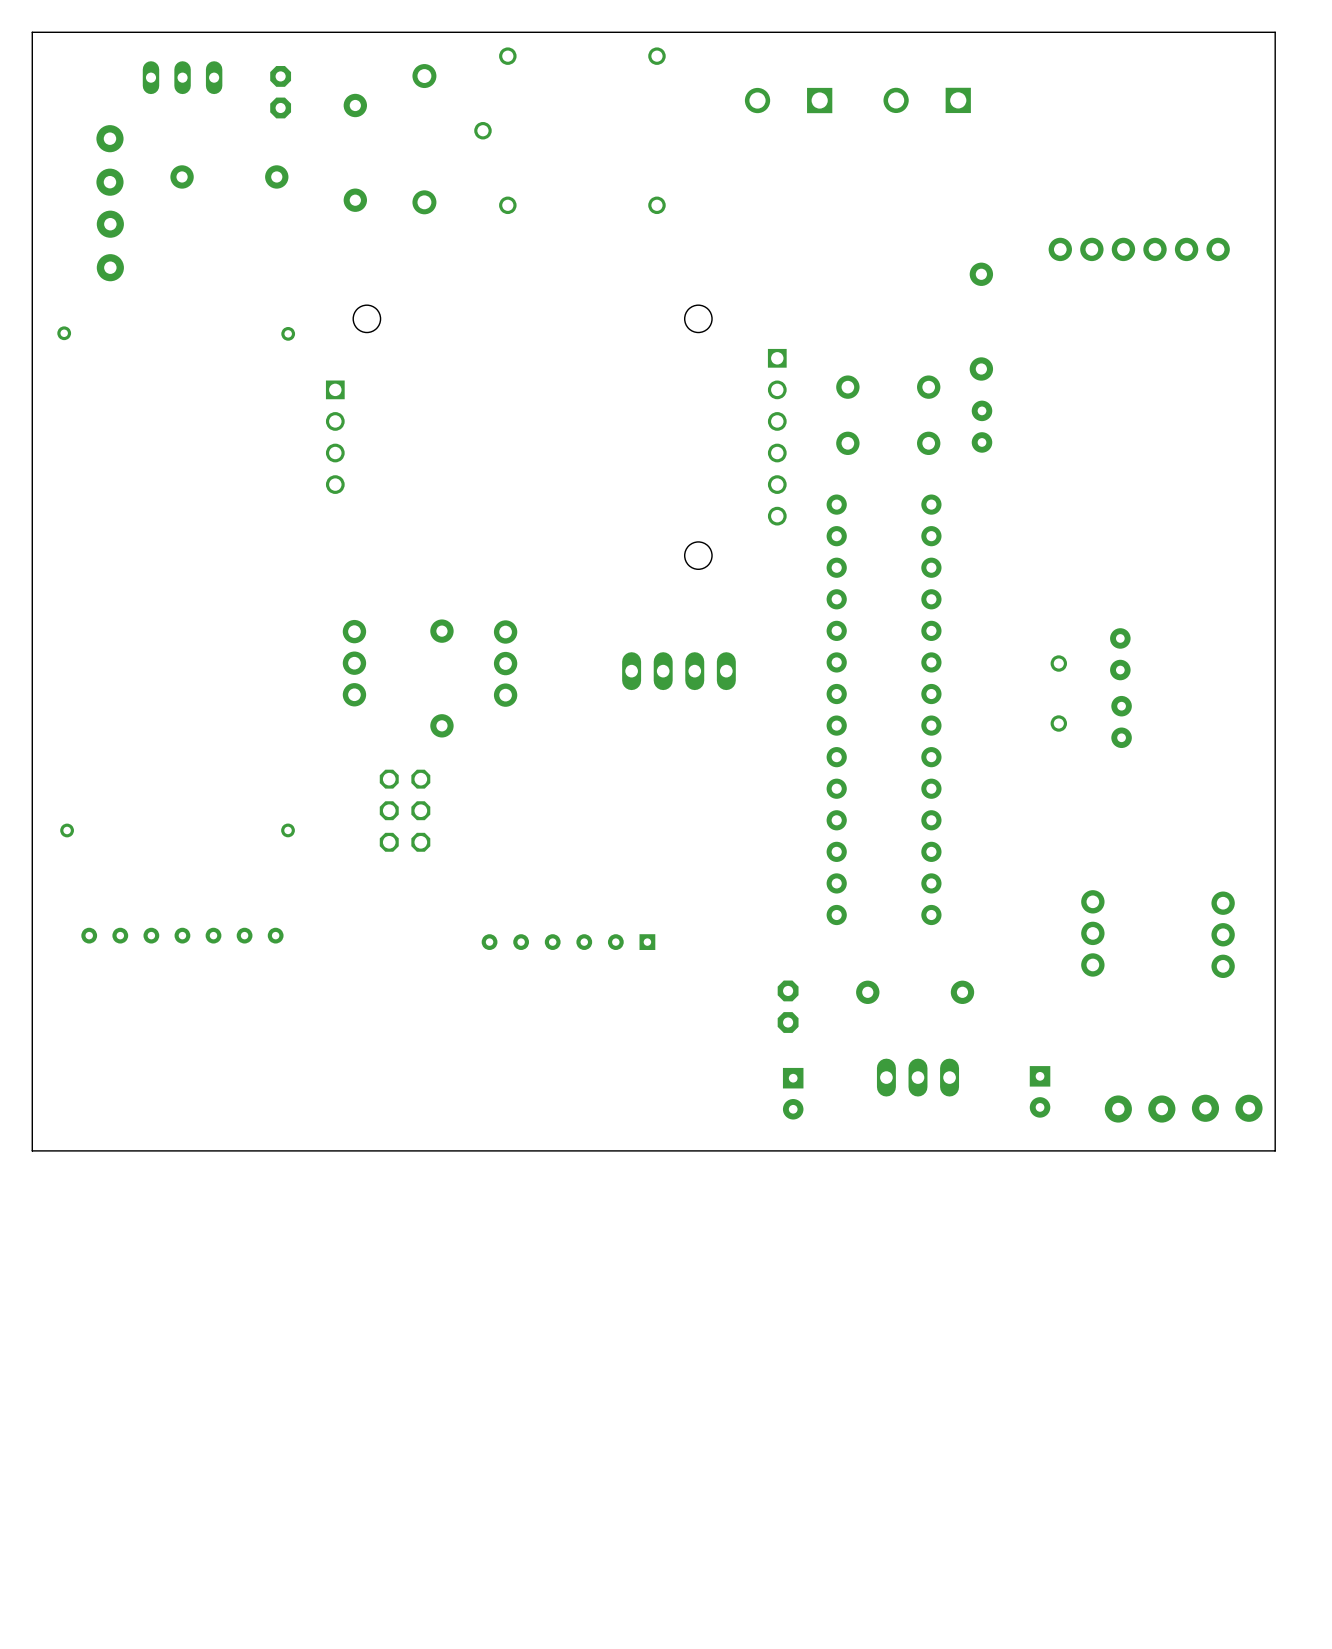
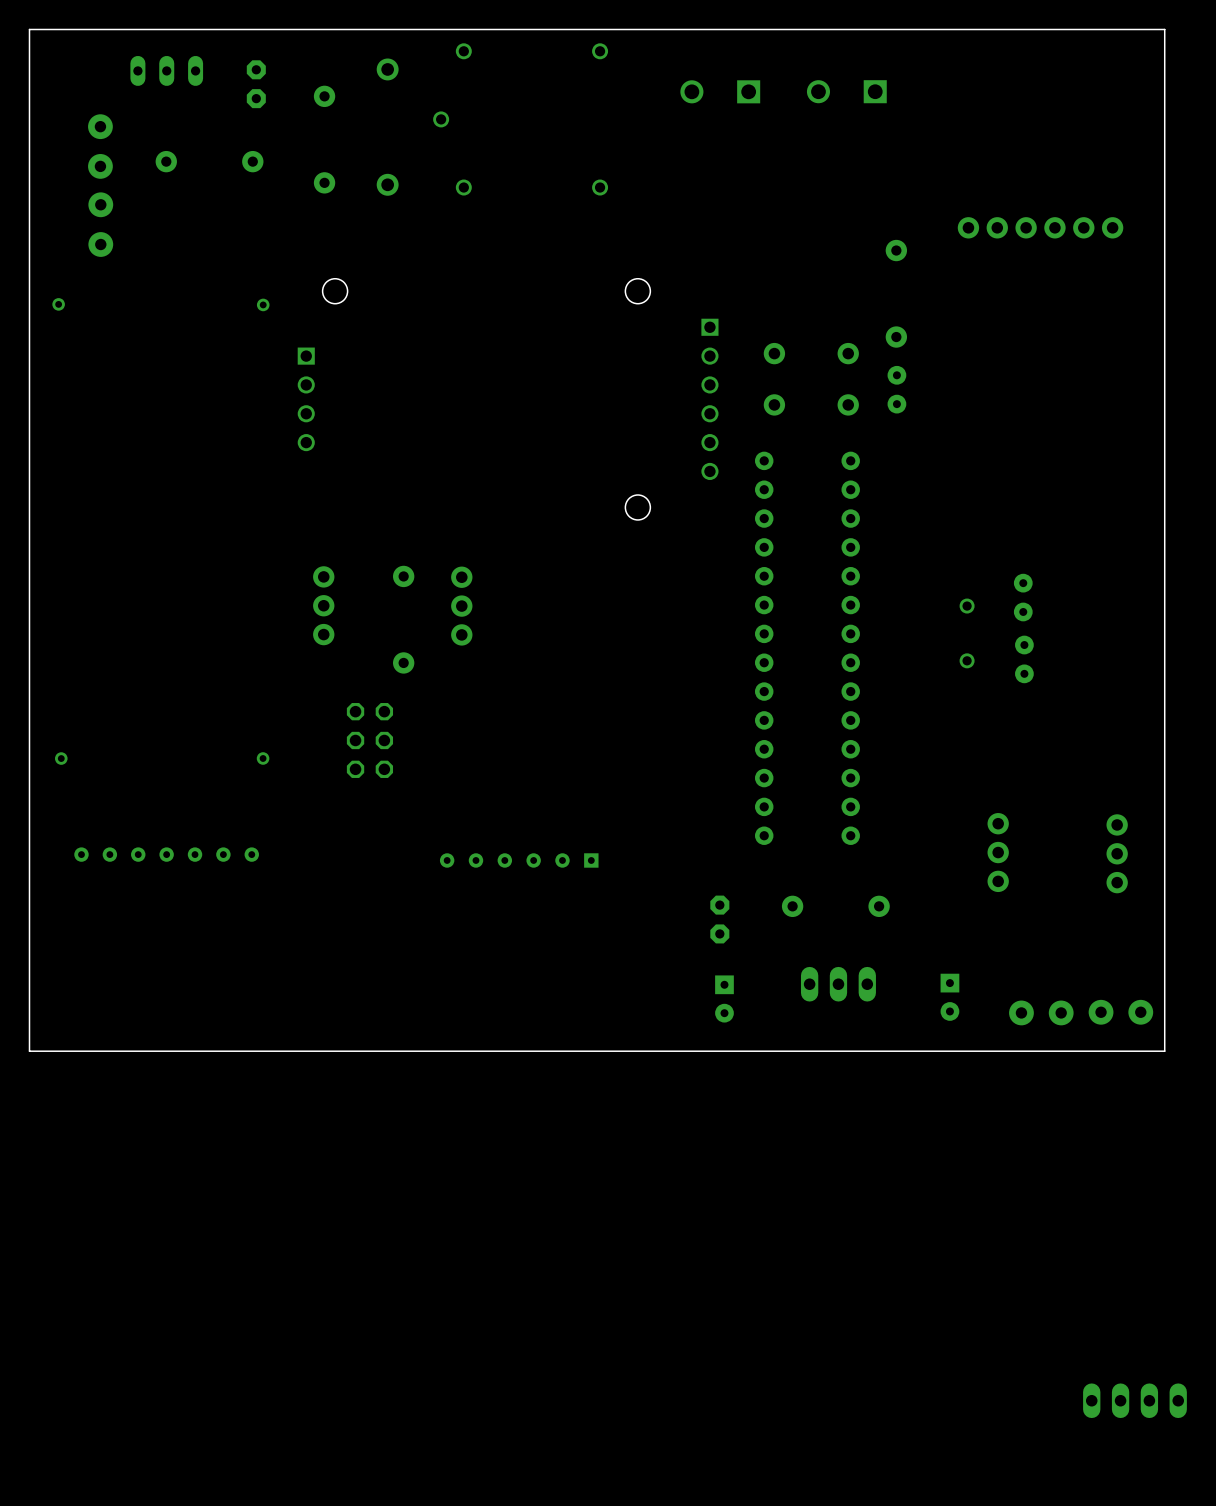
part: (678, 671) -> none
part: none -> (1134, 1400)

